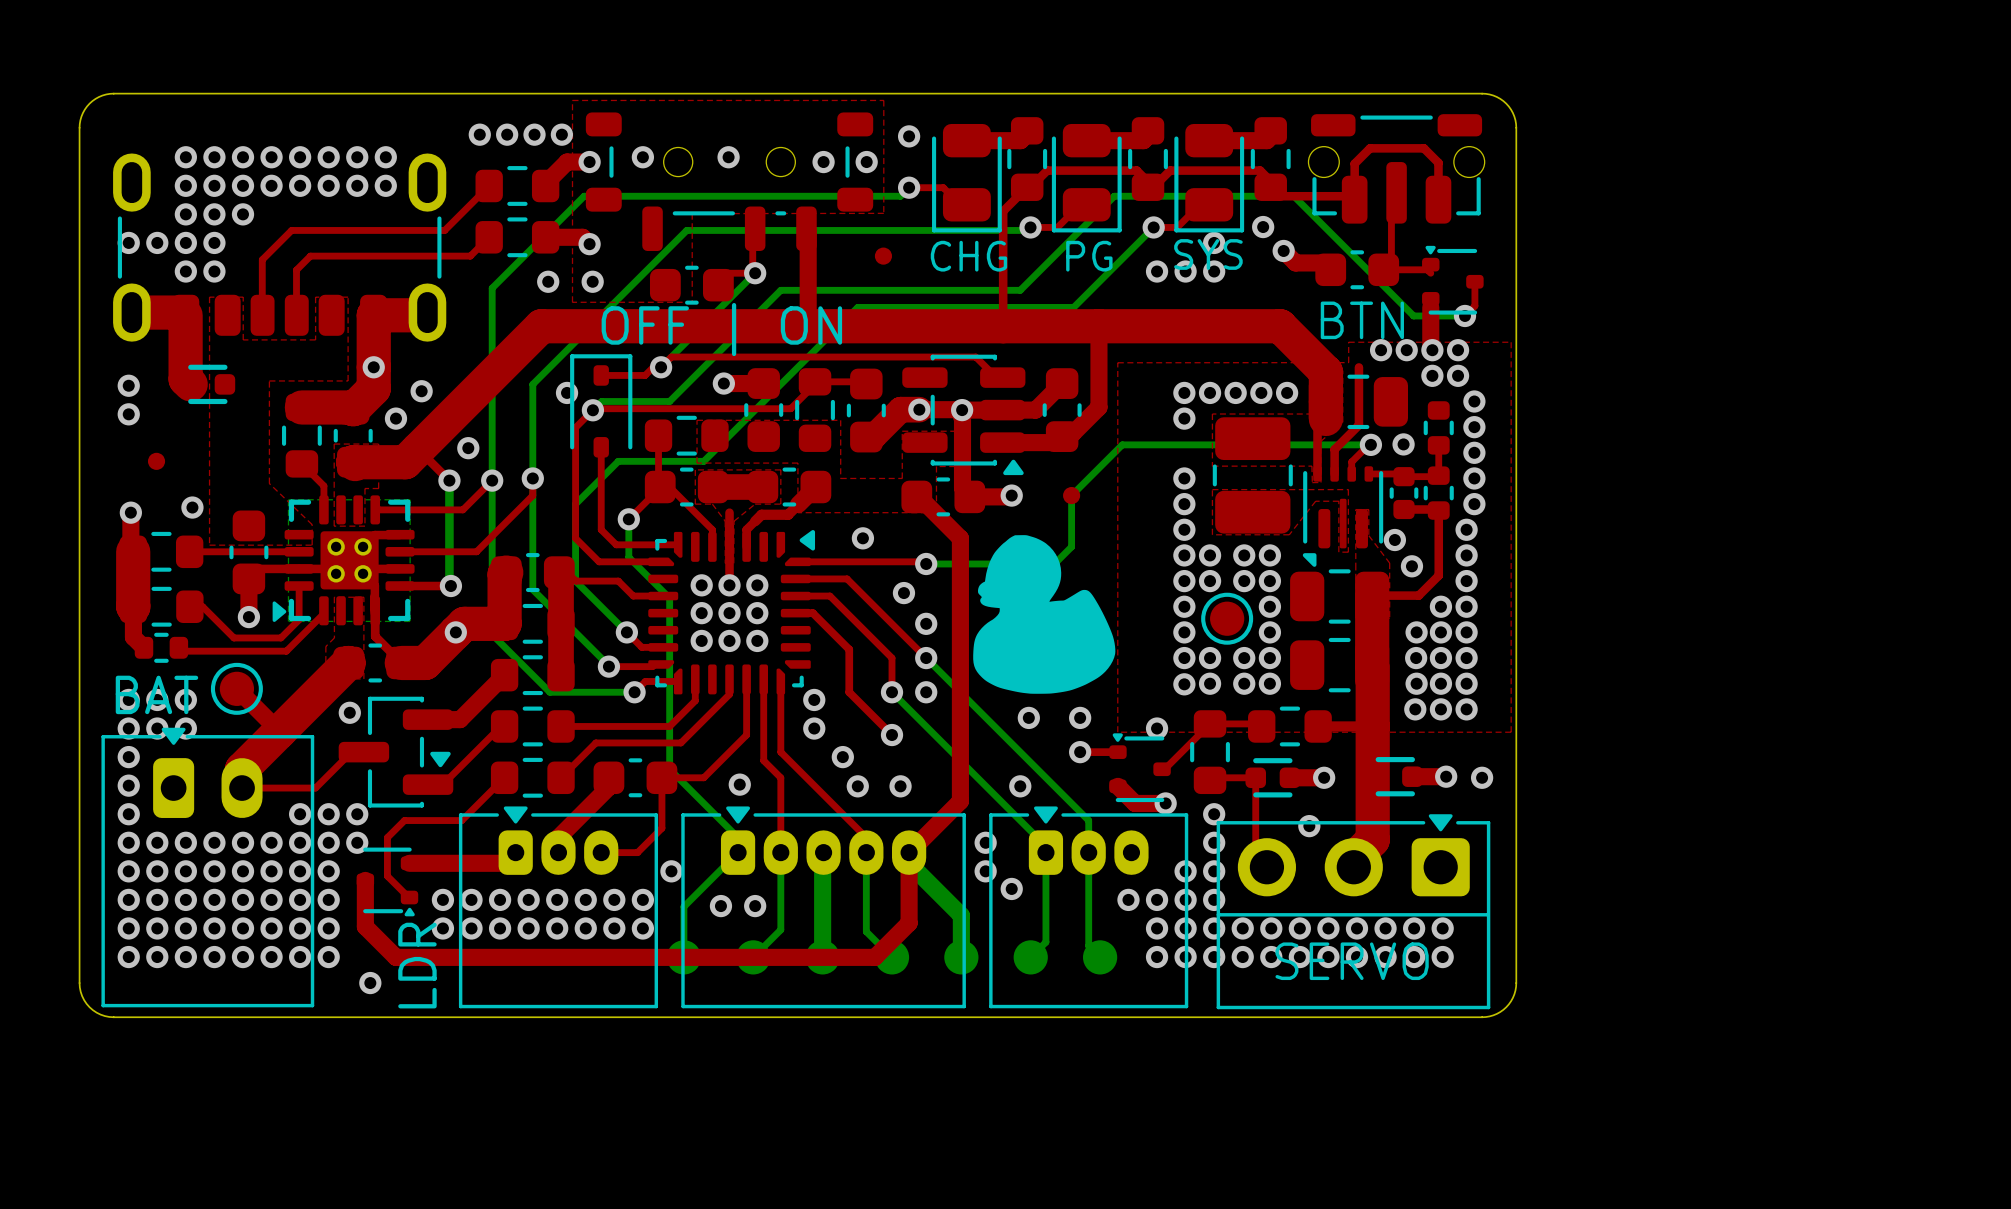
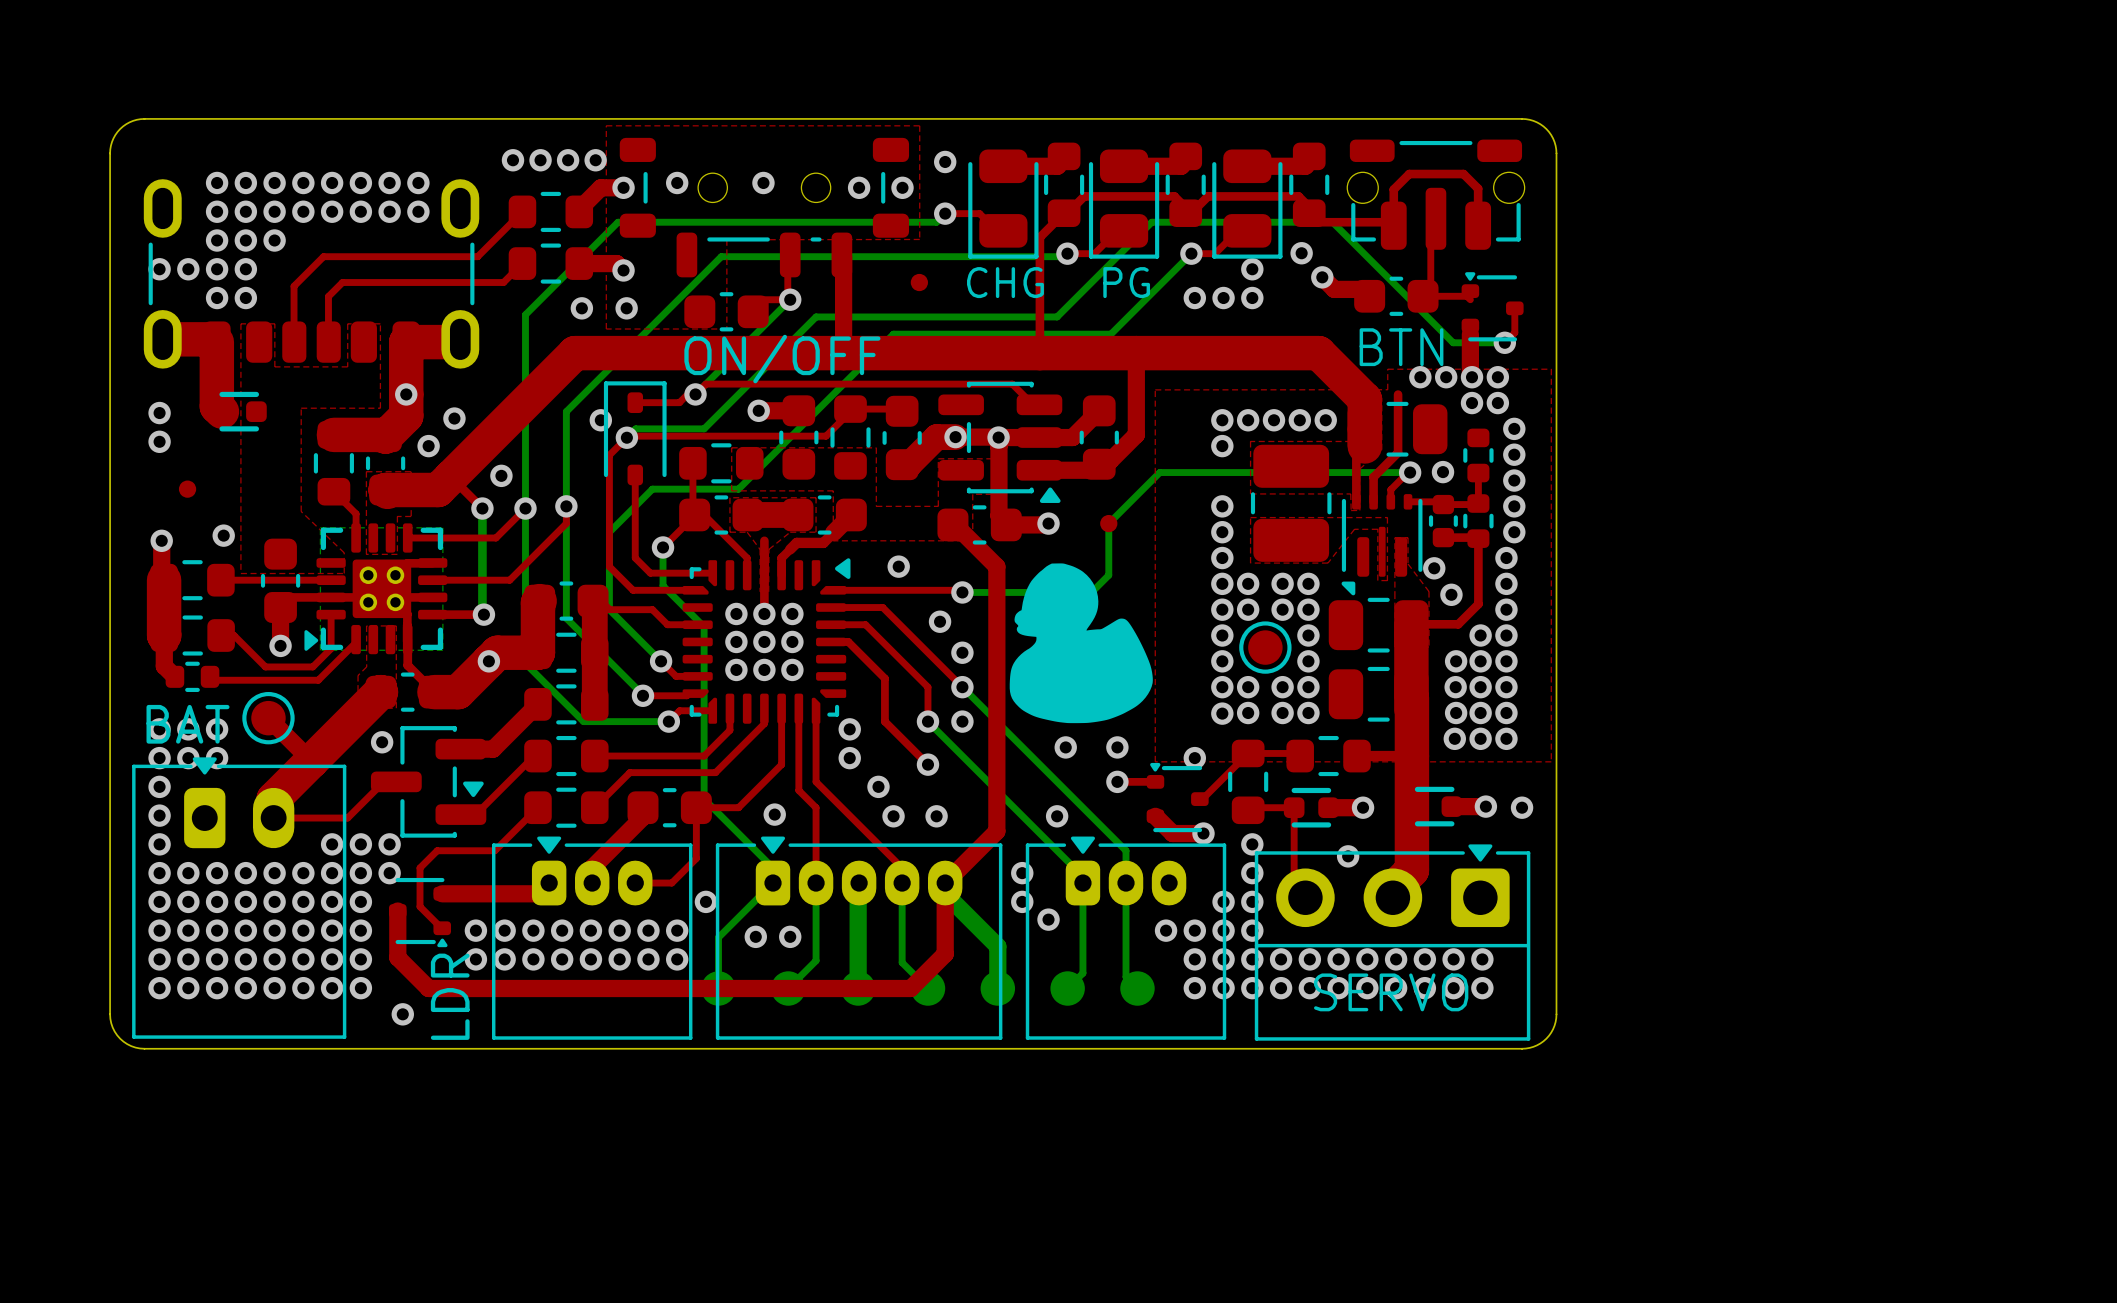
text: SYS (1208, 254) -> none
text: OFF | ON (721, 329) -> ON/OFF (782, 359)

